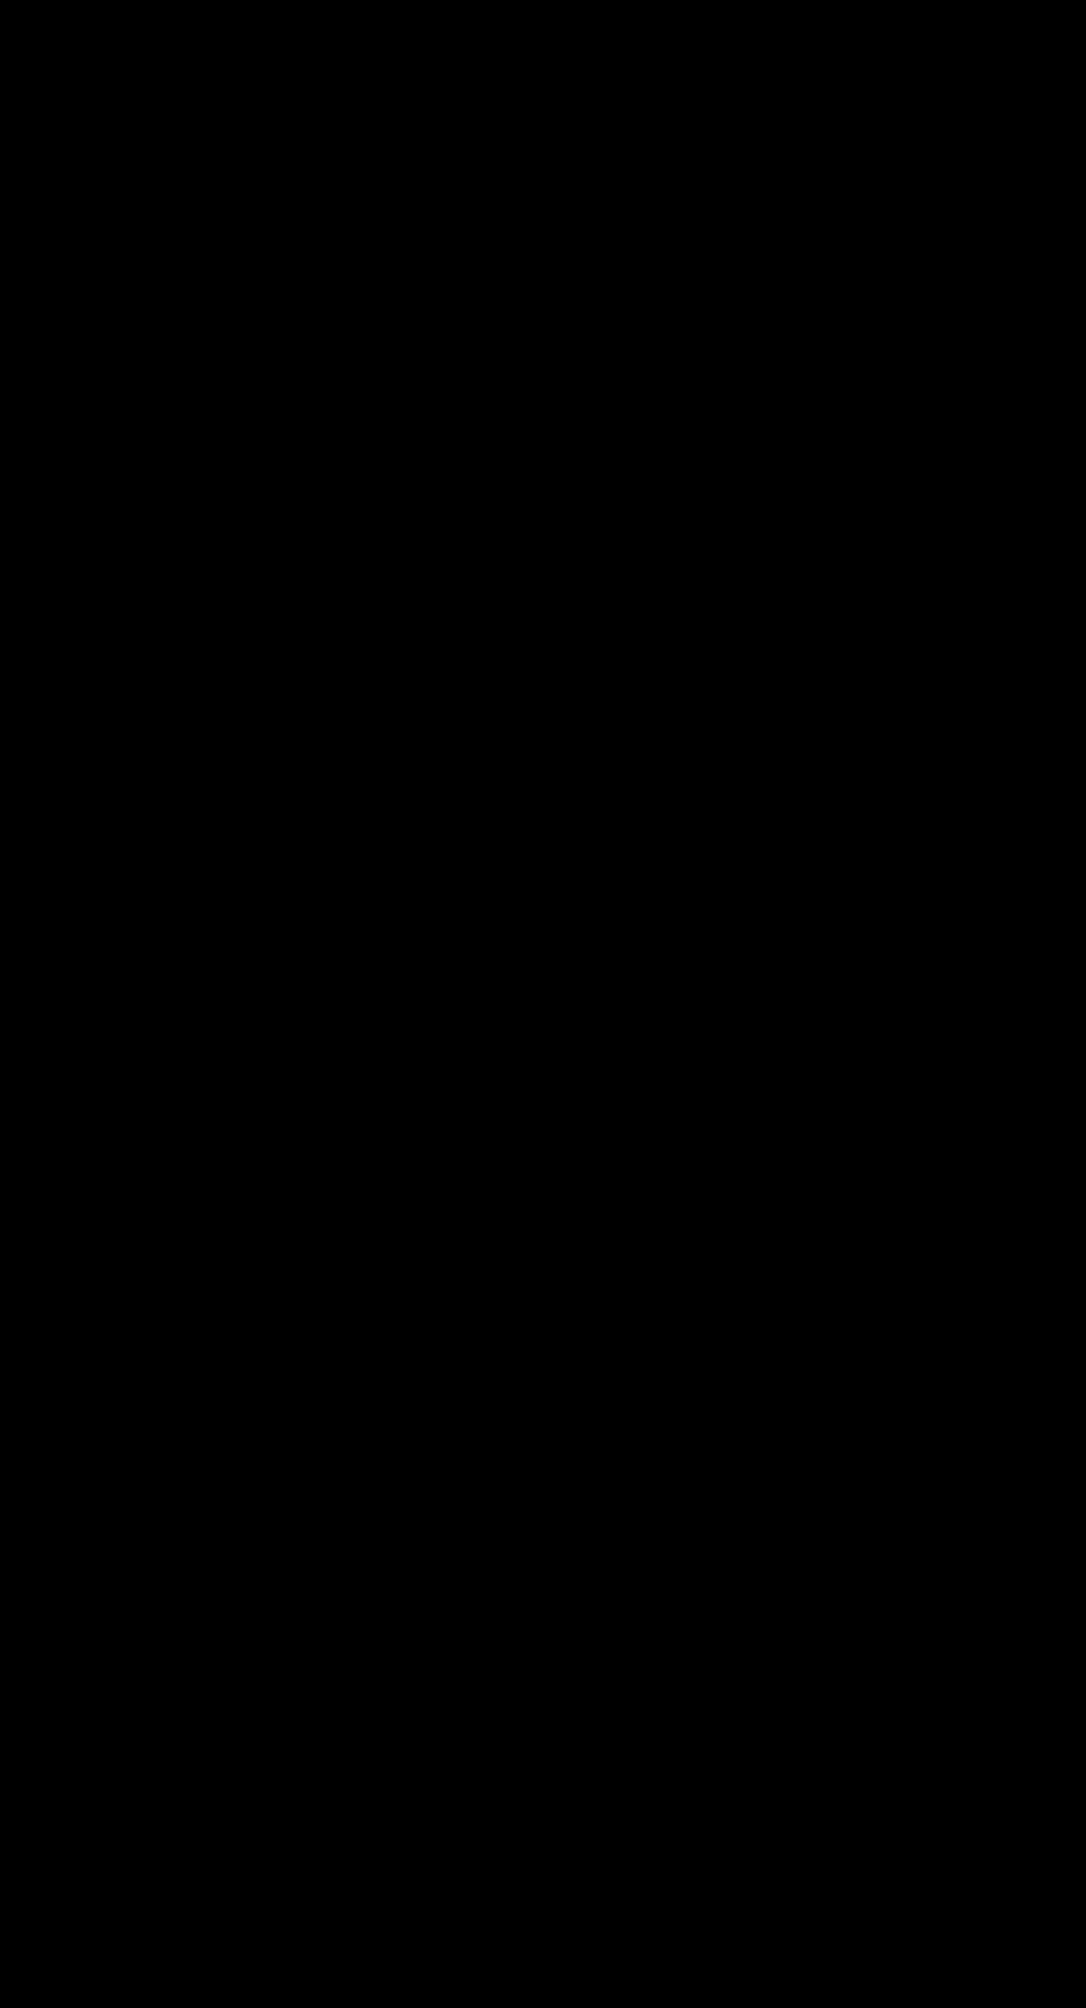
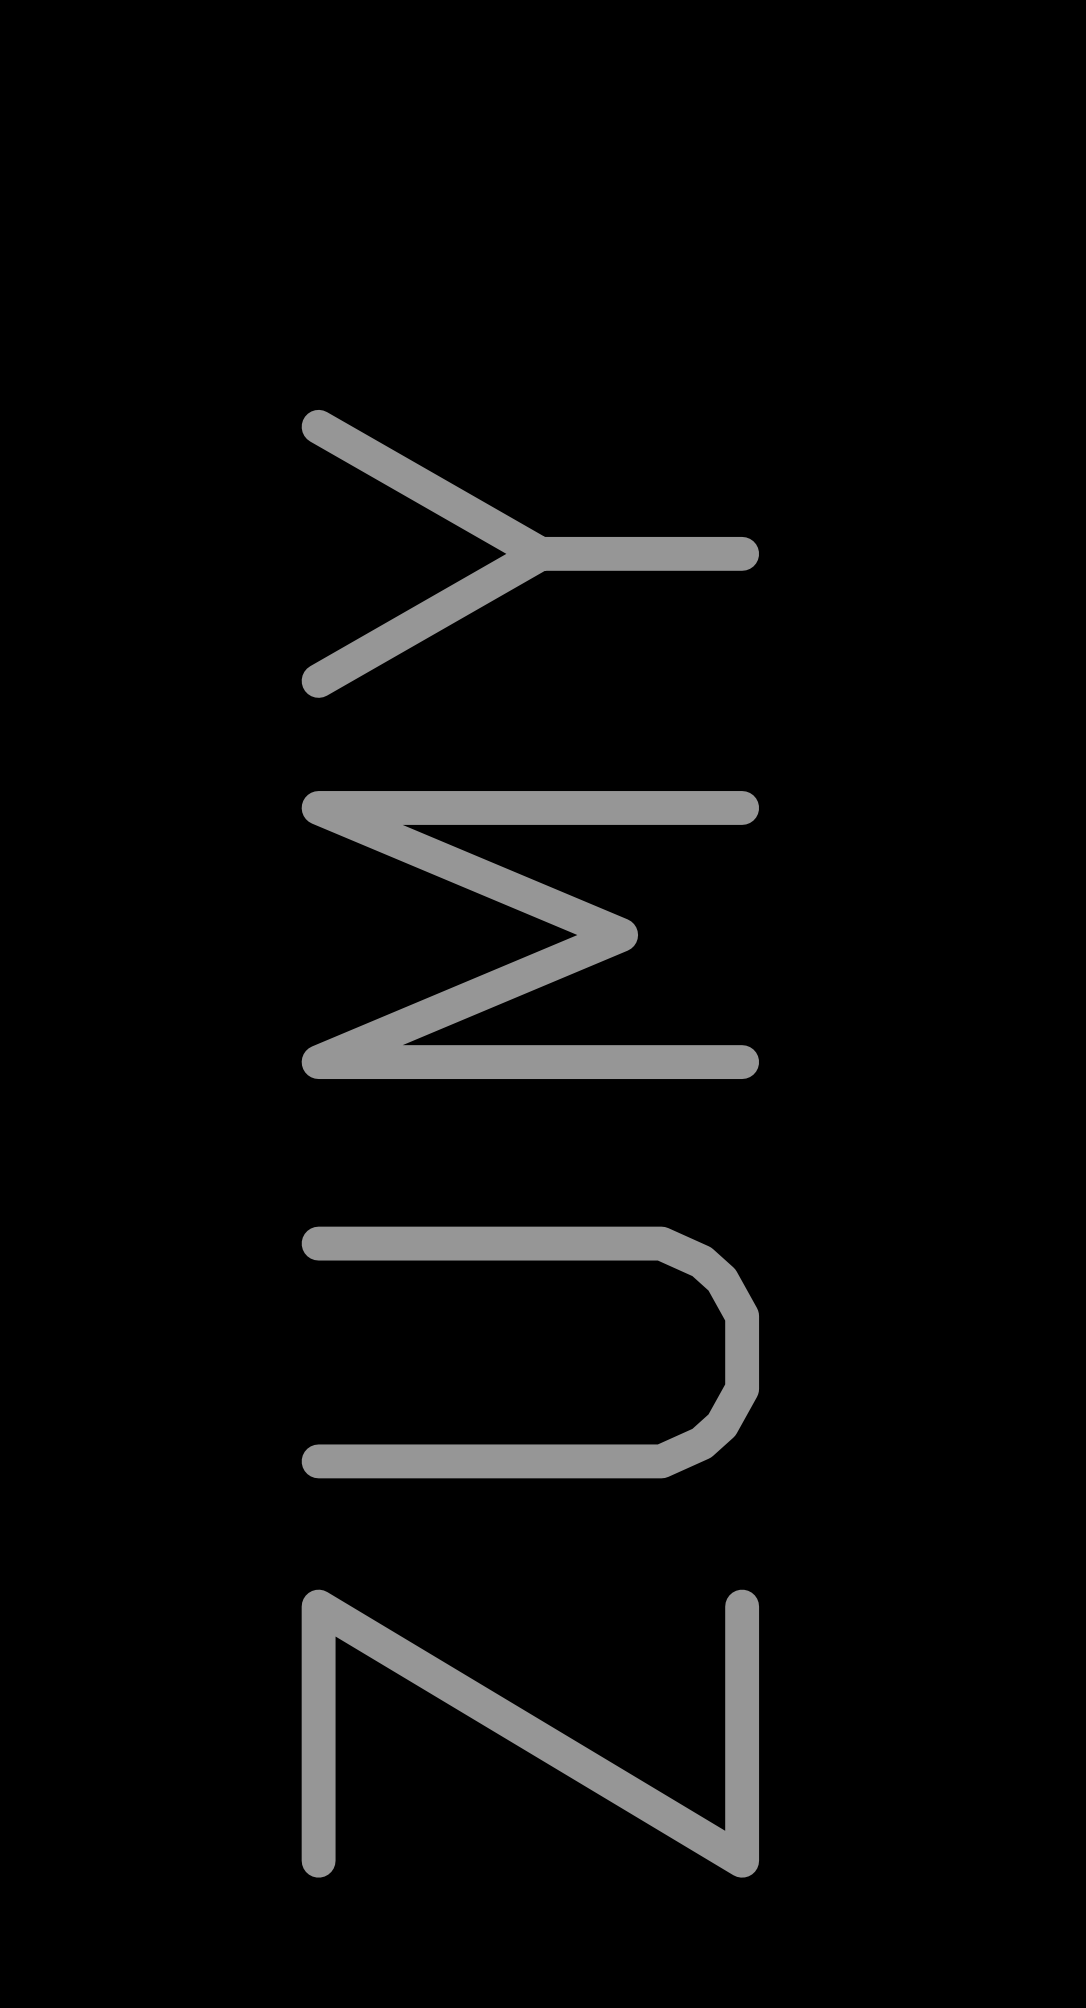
text: none -> ZUMY (530, 1143)

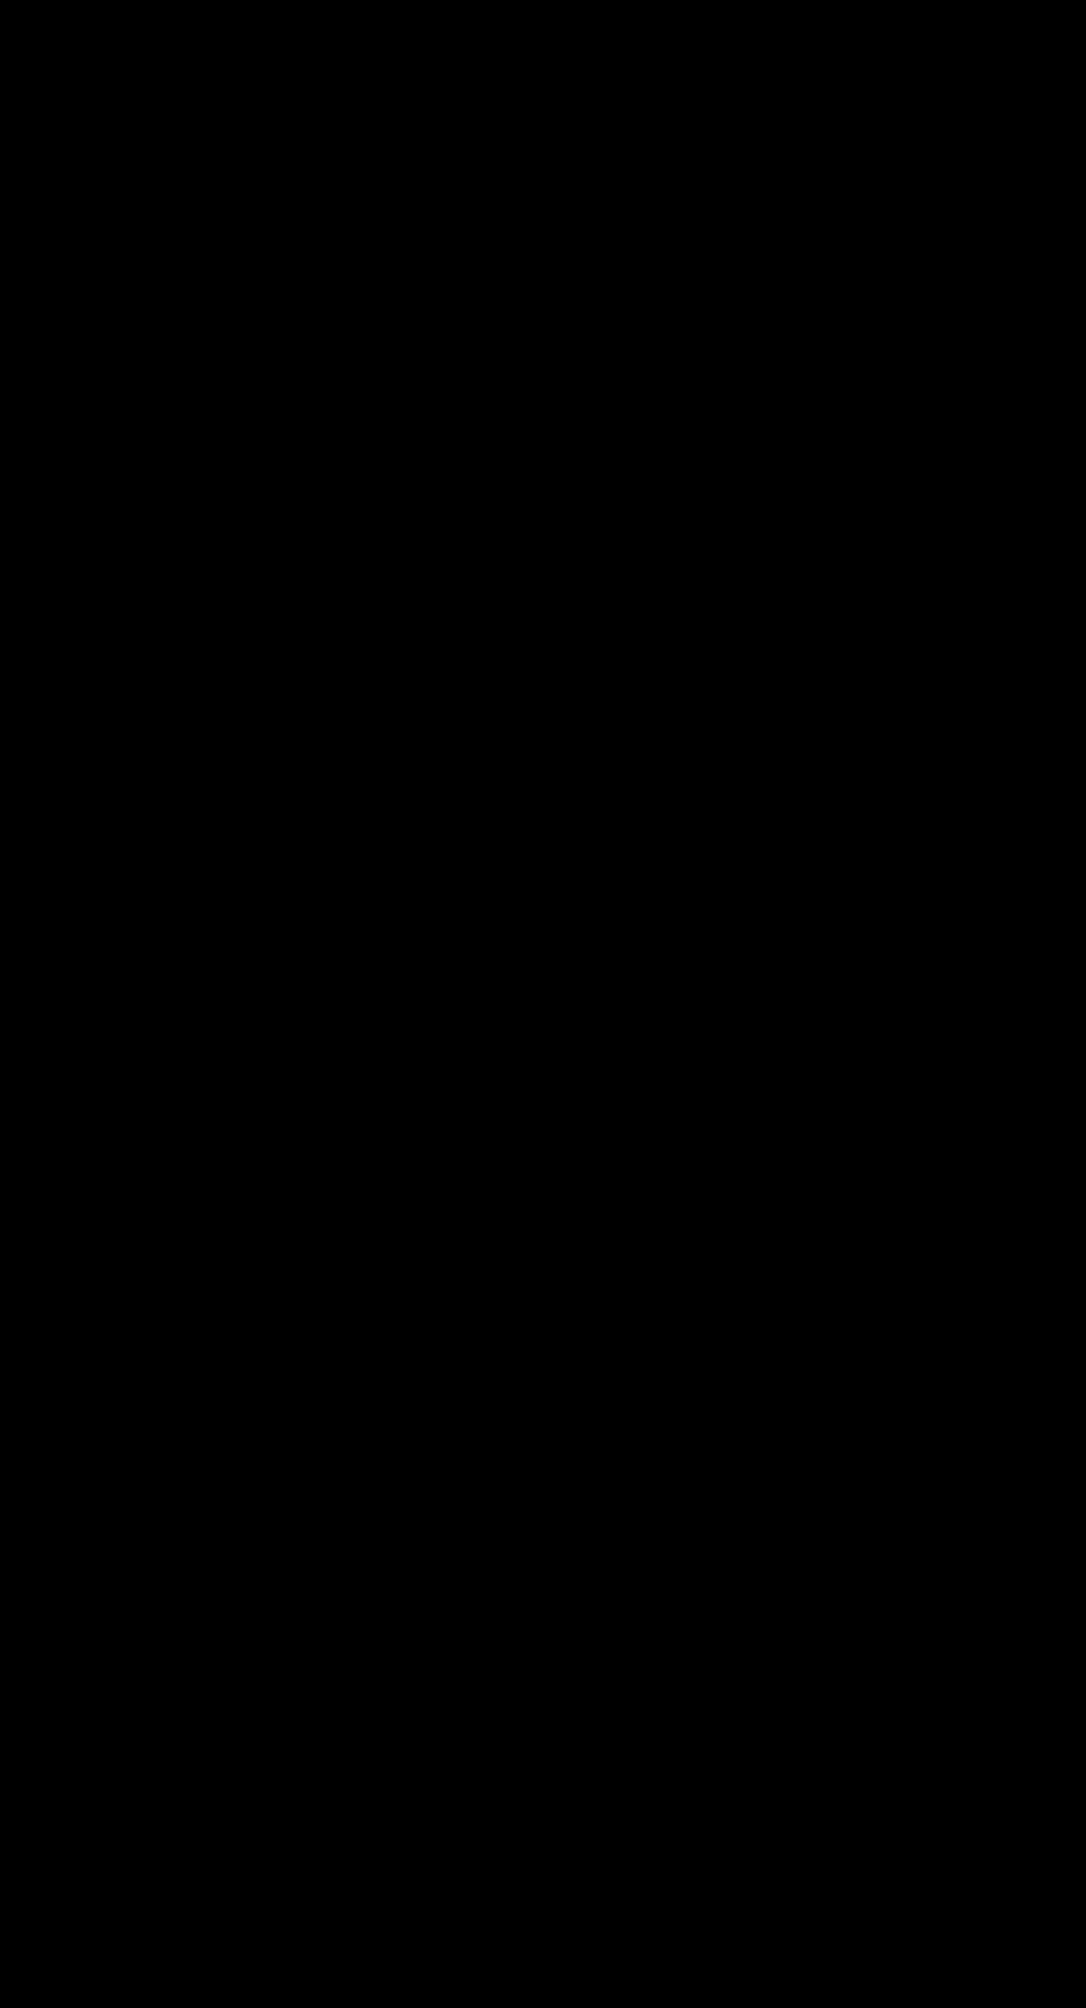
text: ZUMY (530, 1143) -> none

